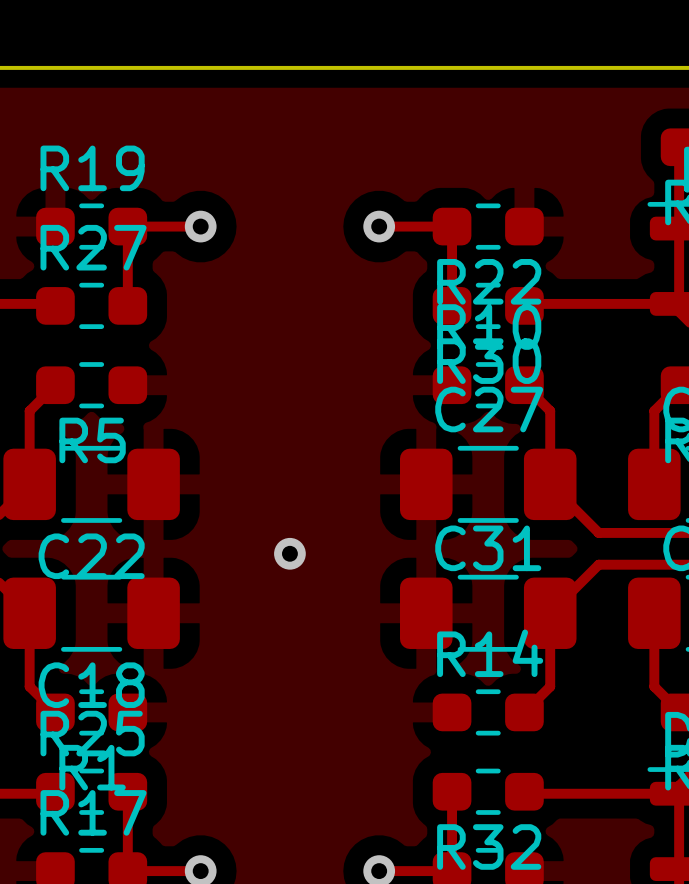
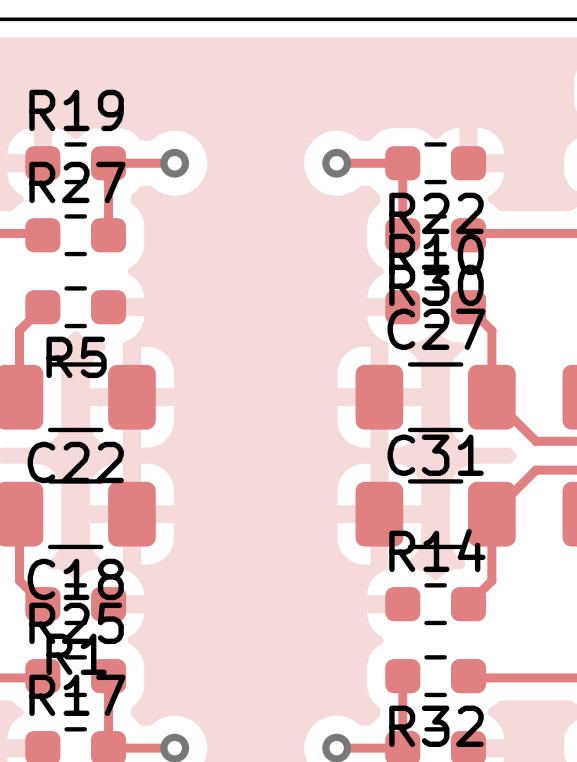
via: (289, 553) -> none

